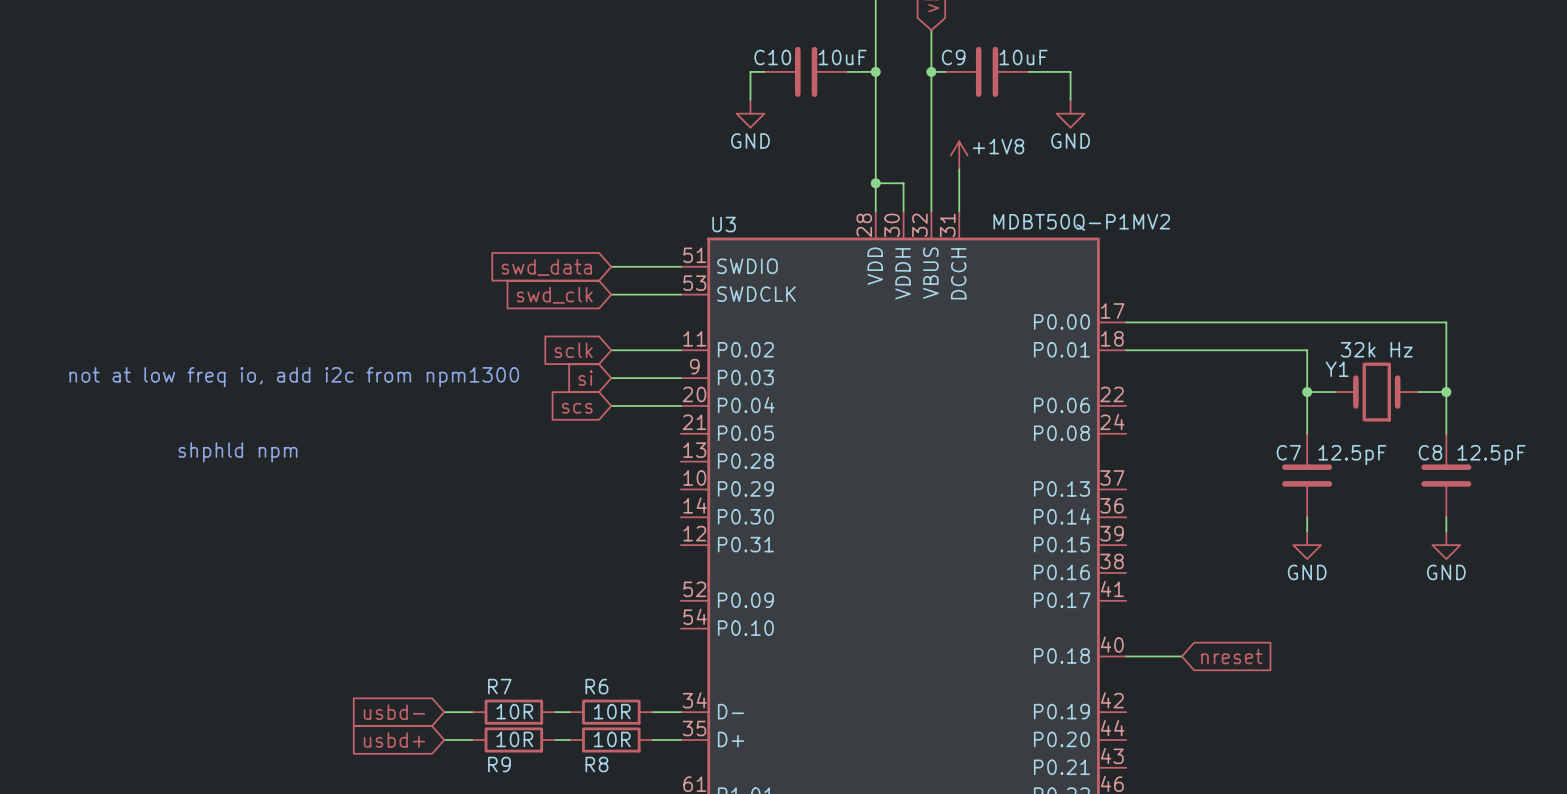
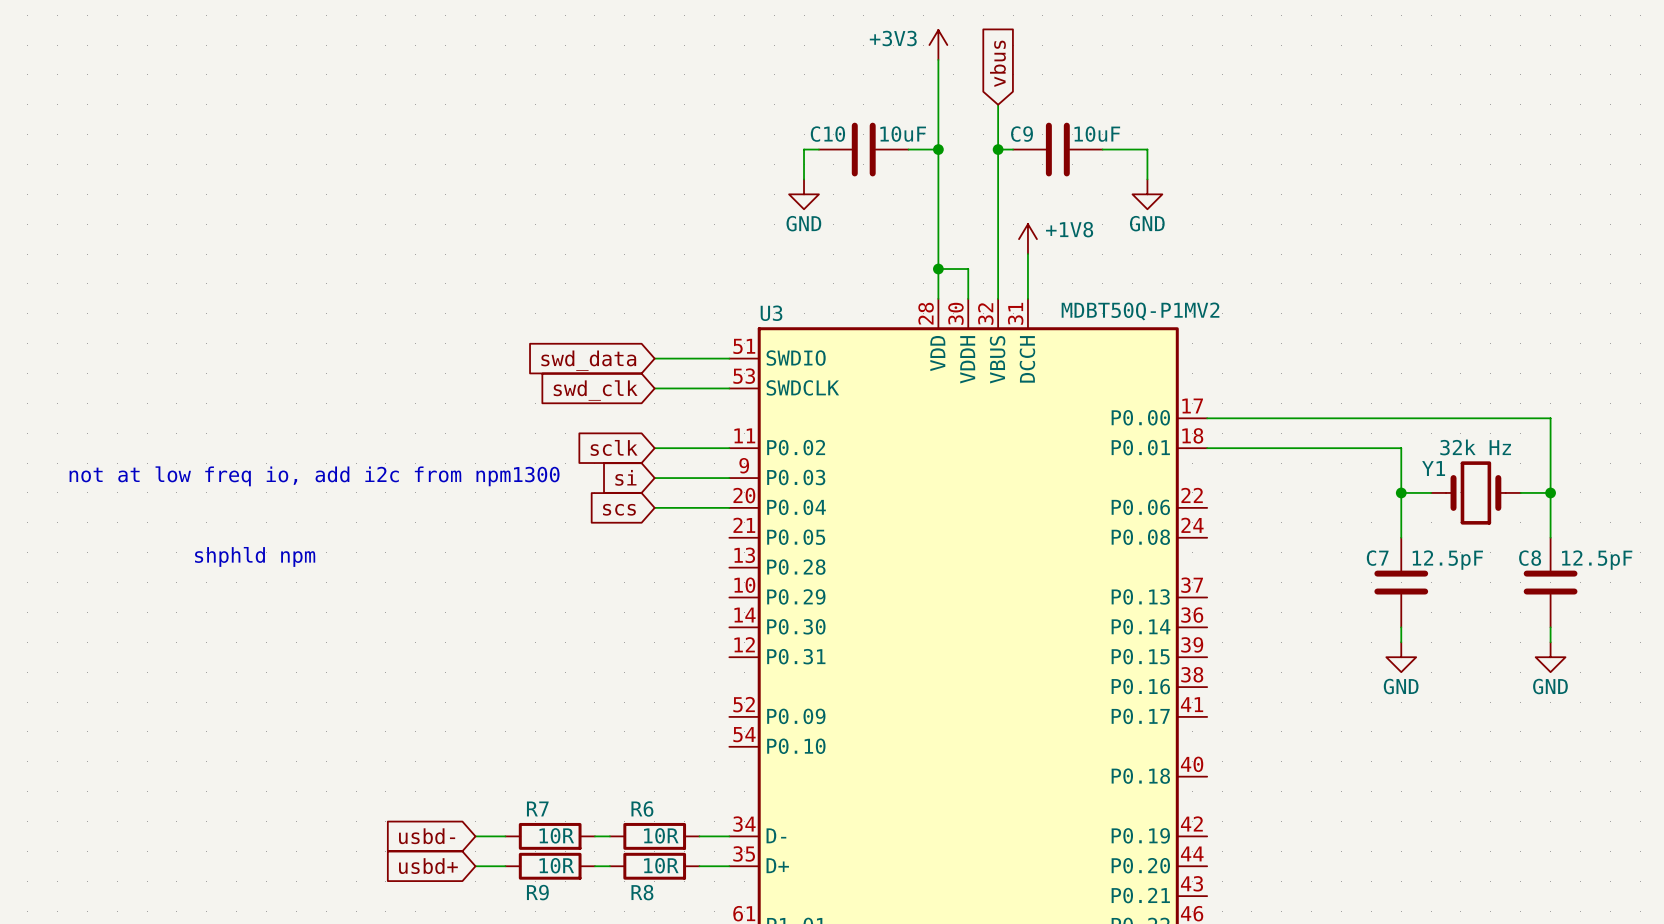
wire: (1126, 656) (1181, 656) -> none
global label: nreset (1231, 656) -> none

